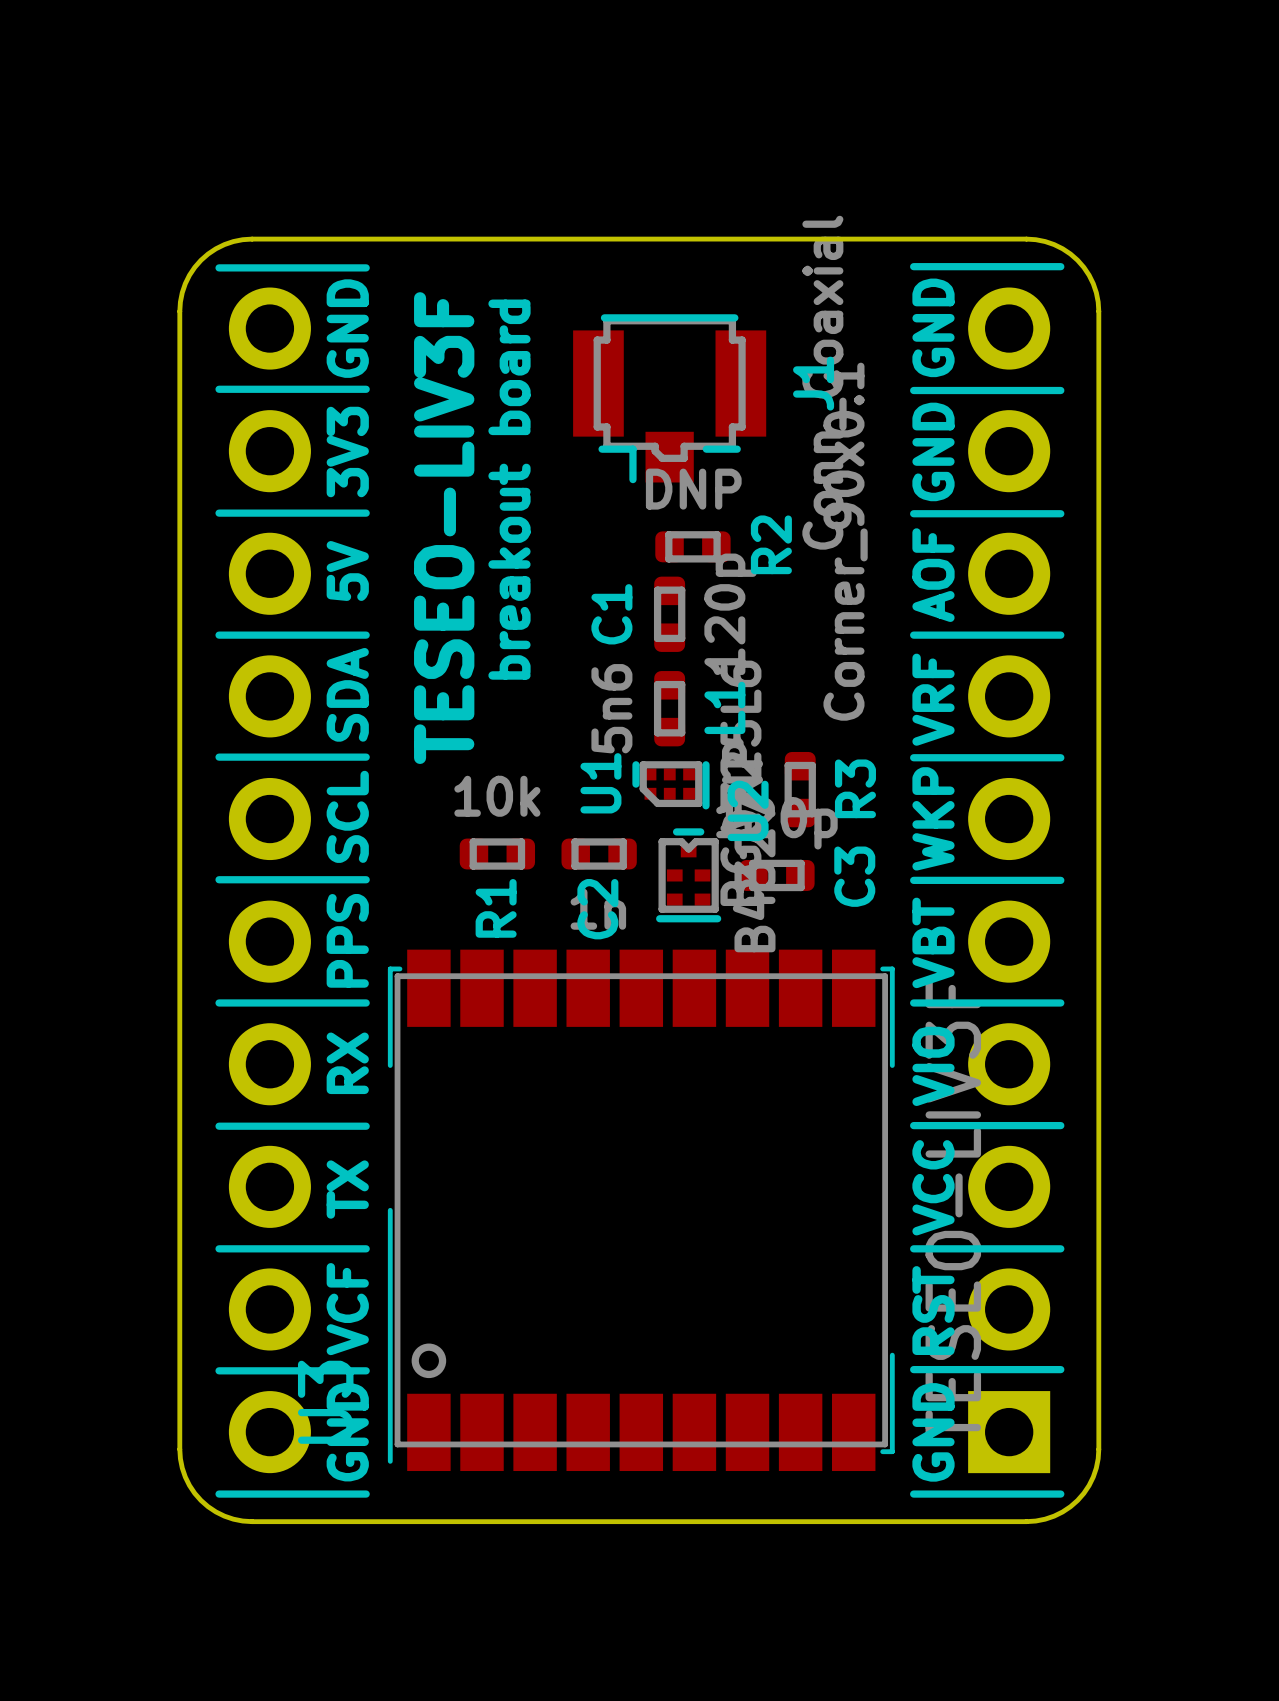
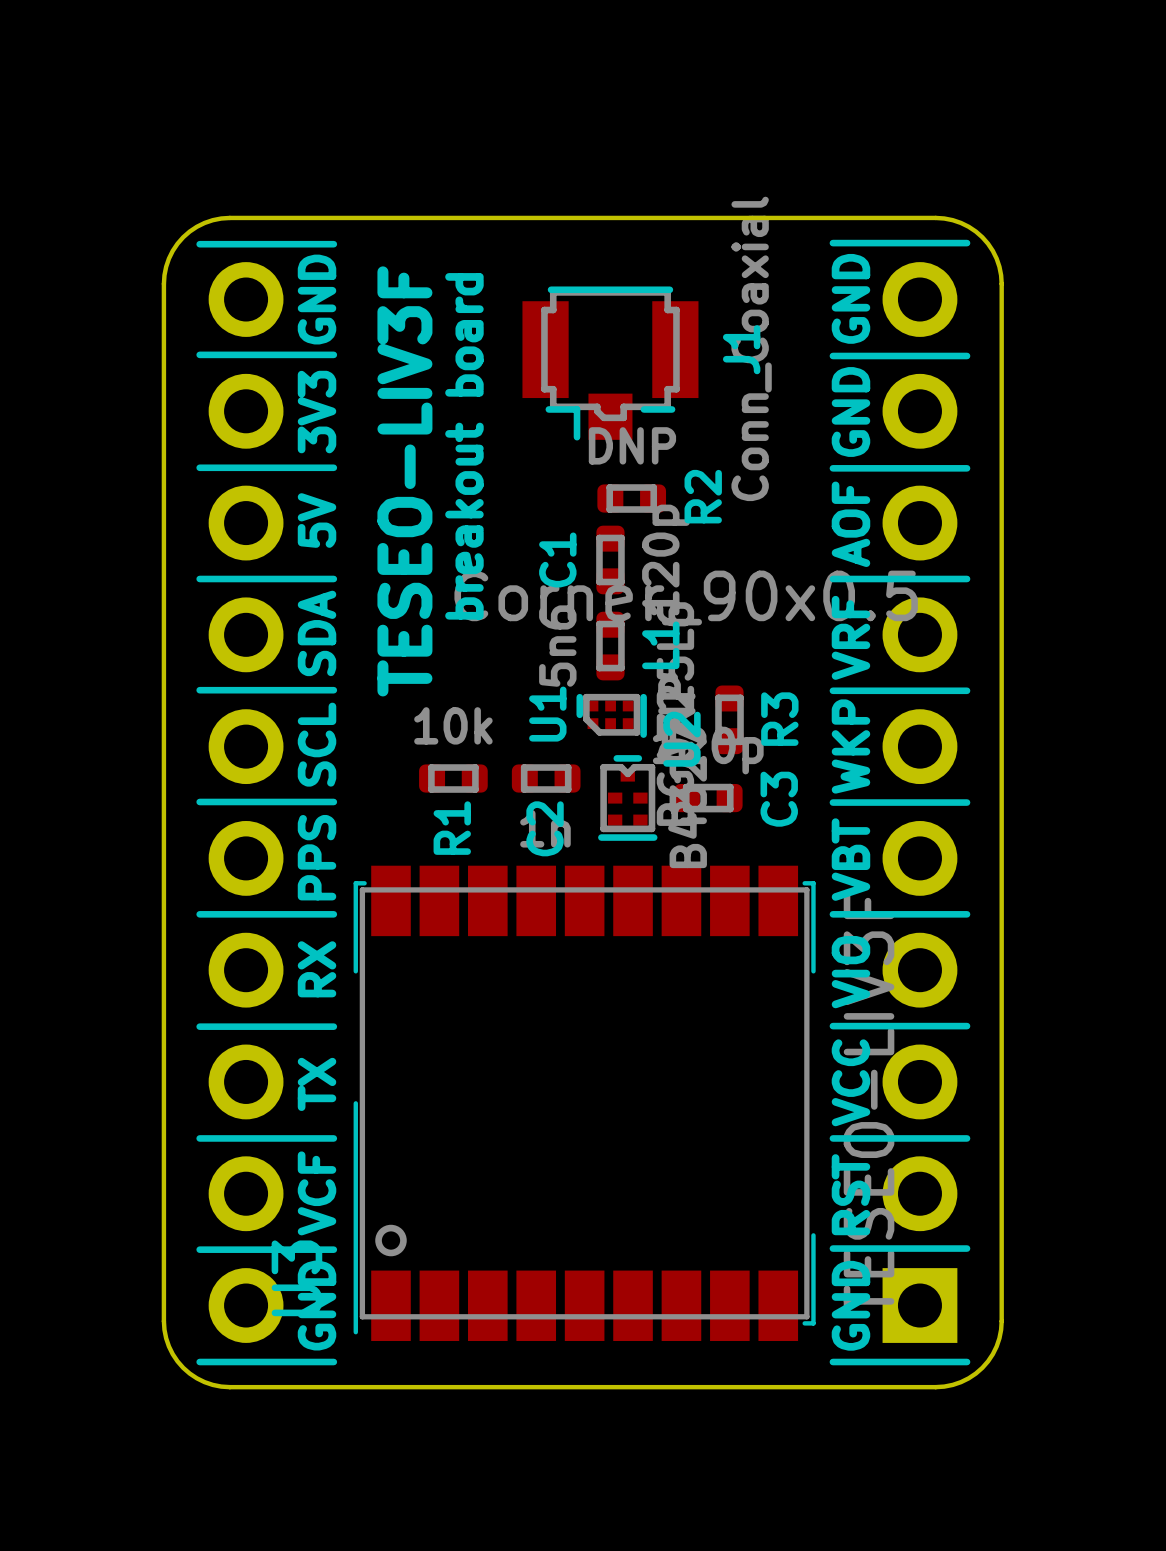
drawing: [823, 362, 868, 721] -> none
drawing: none -> [454, 570, 918, 626]

